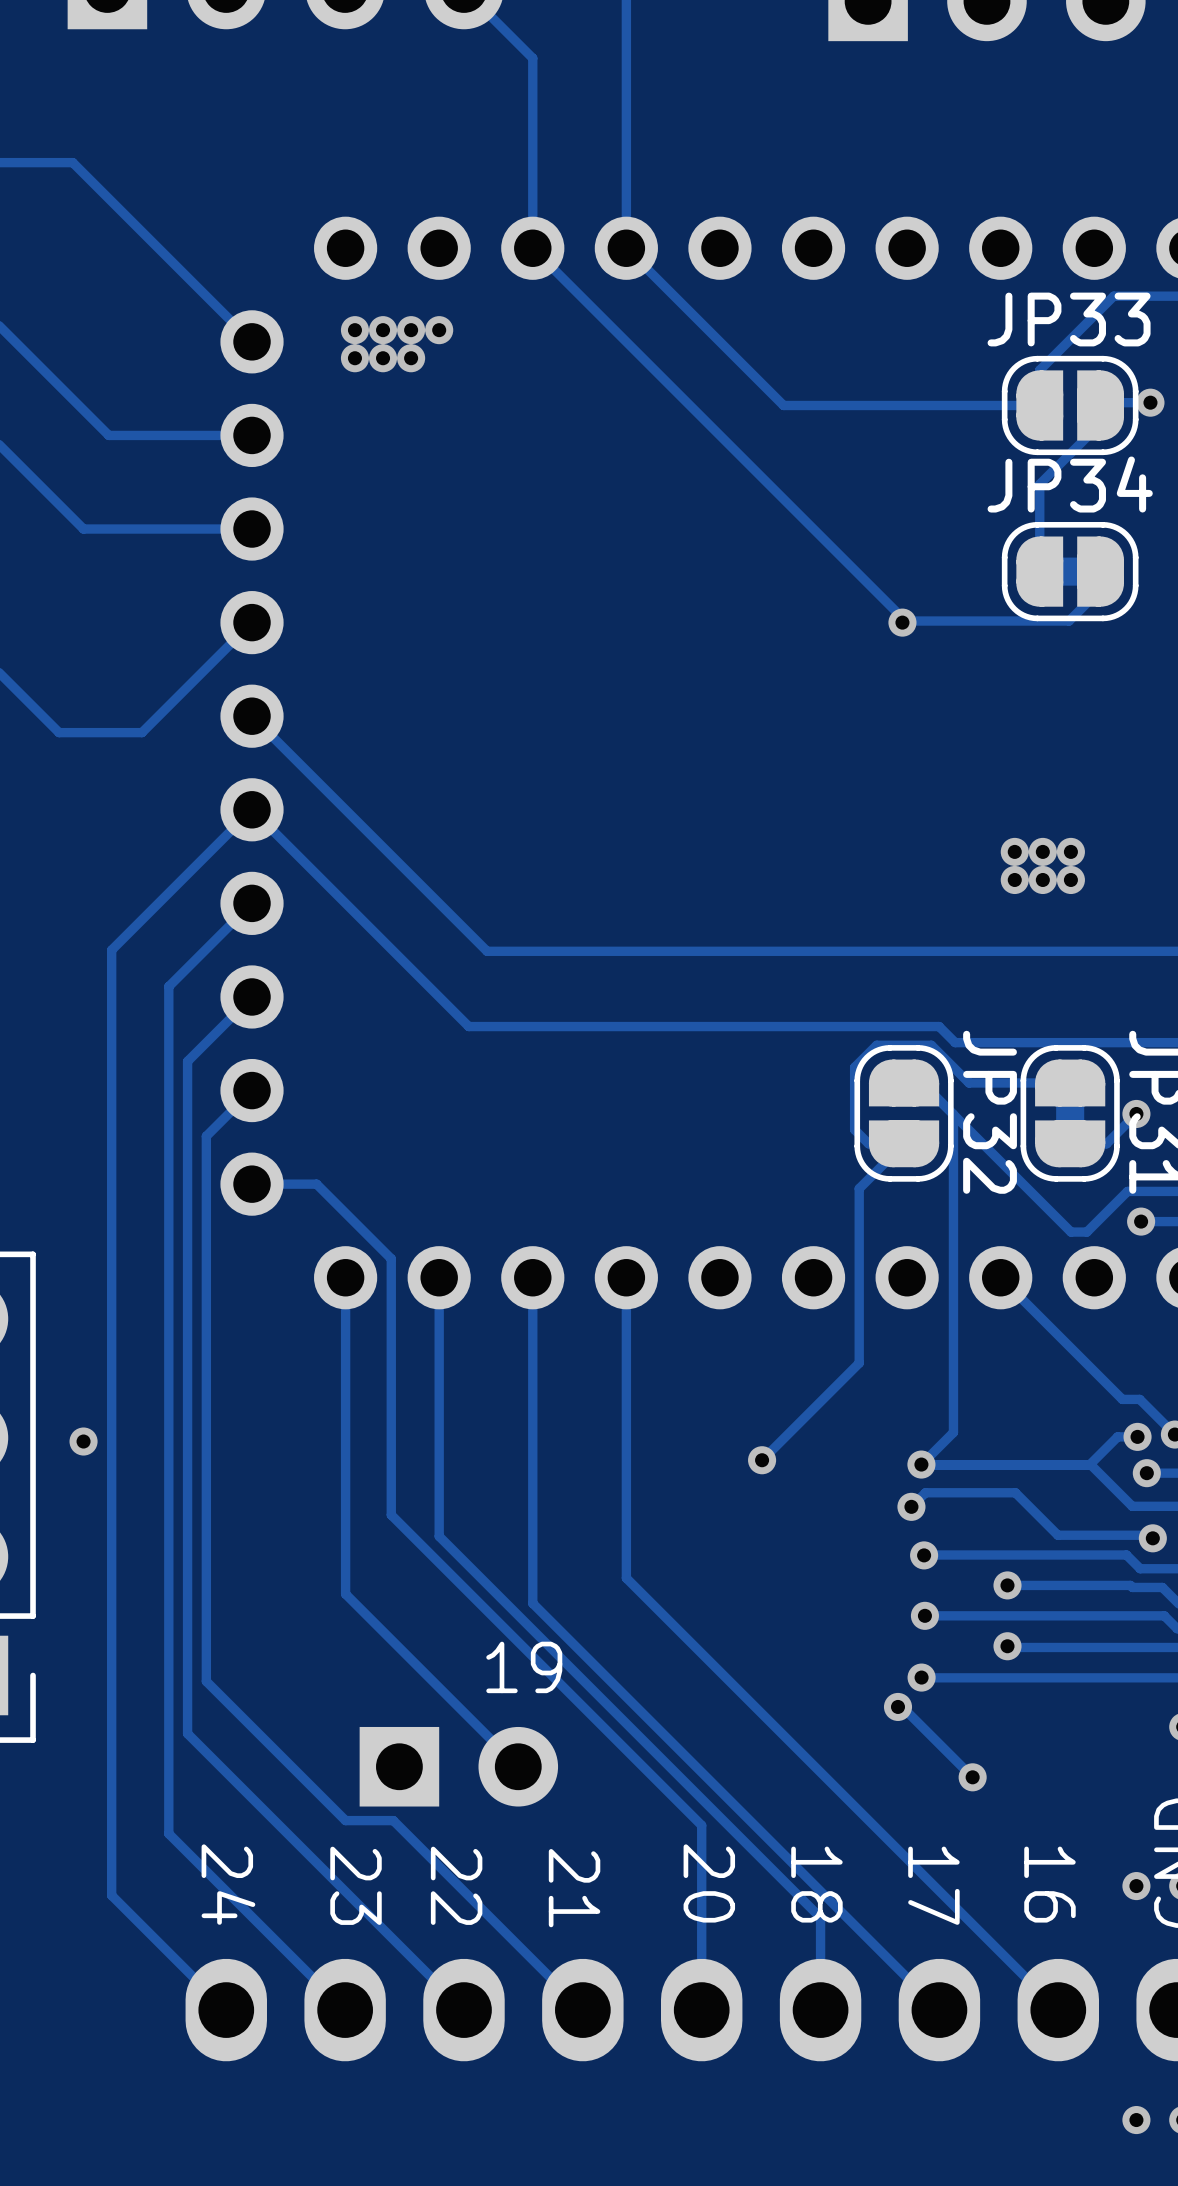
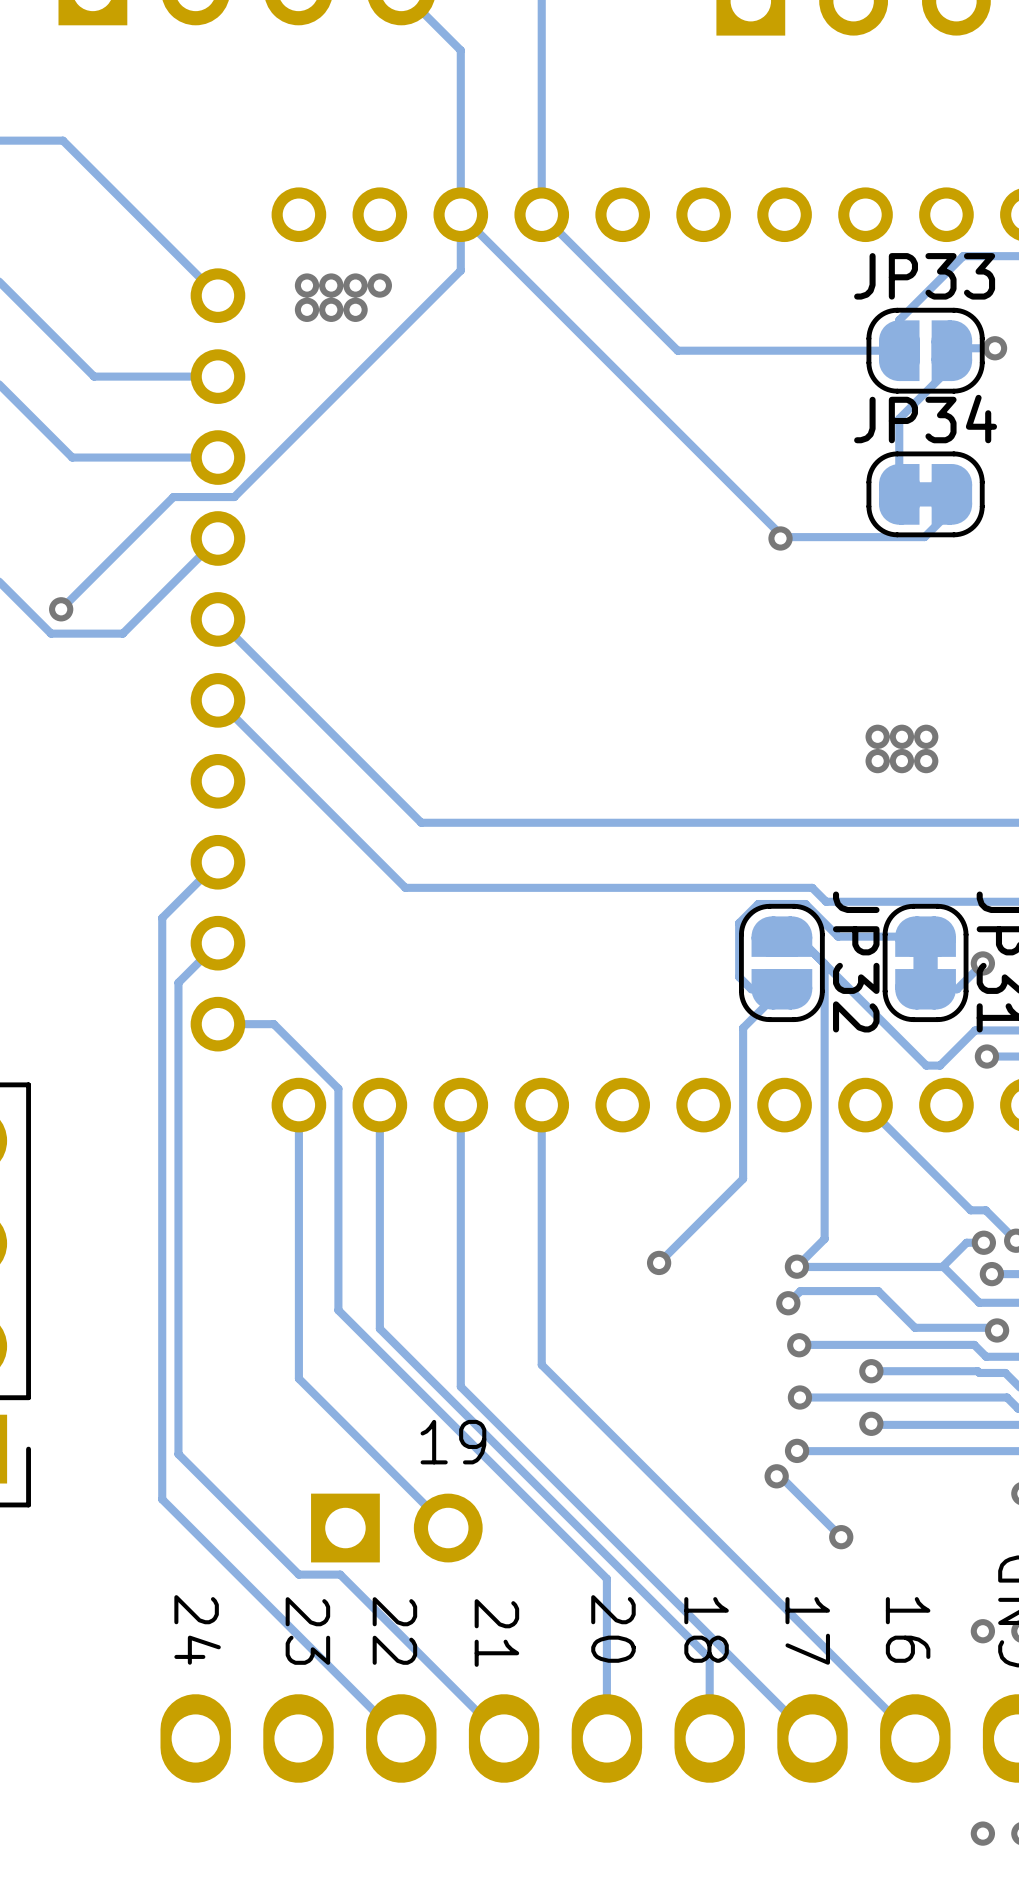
track: none -> (460, 214) (460, 270) (234, 497) (173, 497) (61, 609)
via: none -> (61, 609)
track: (252, 809) (111, 950) (111, 1895) (226, 2010) -> none
track: (252, 903) (168, 986) (168, 1833) (345, 2010) -> none
via: (83, 1441) -> none

